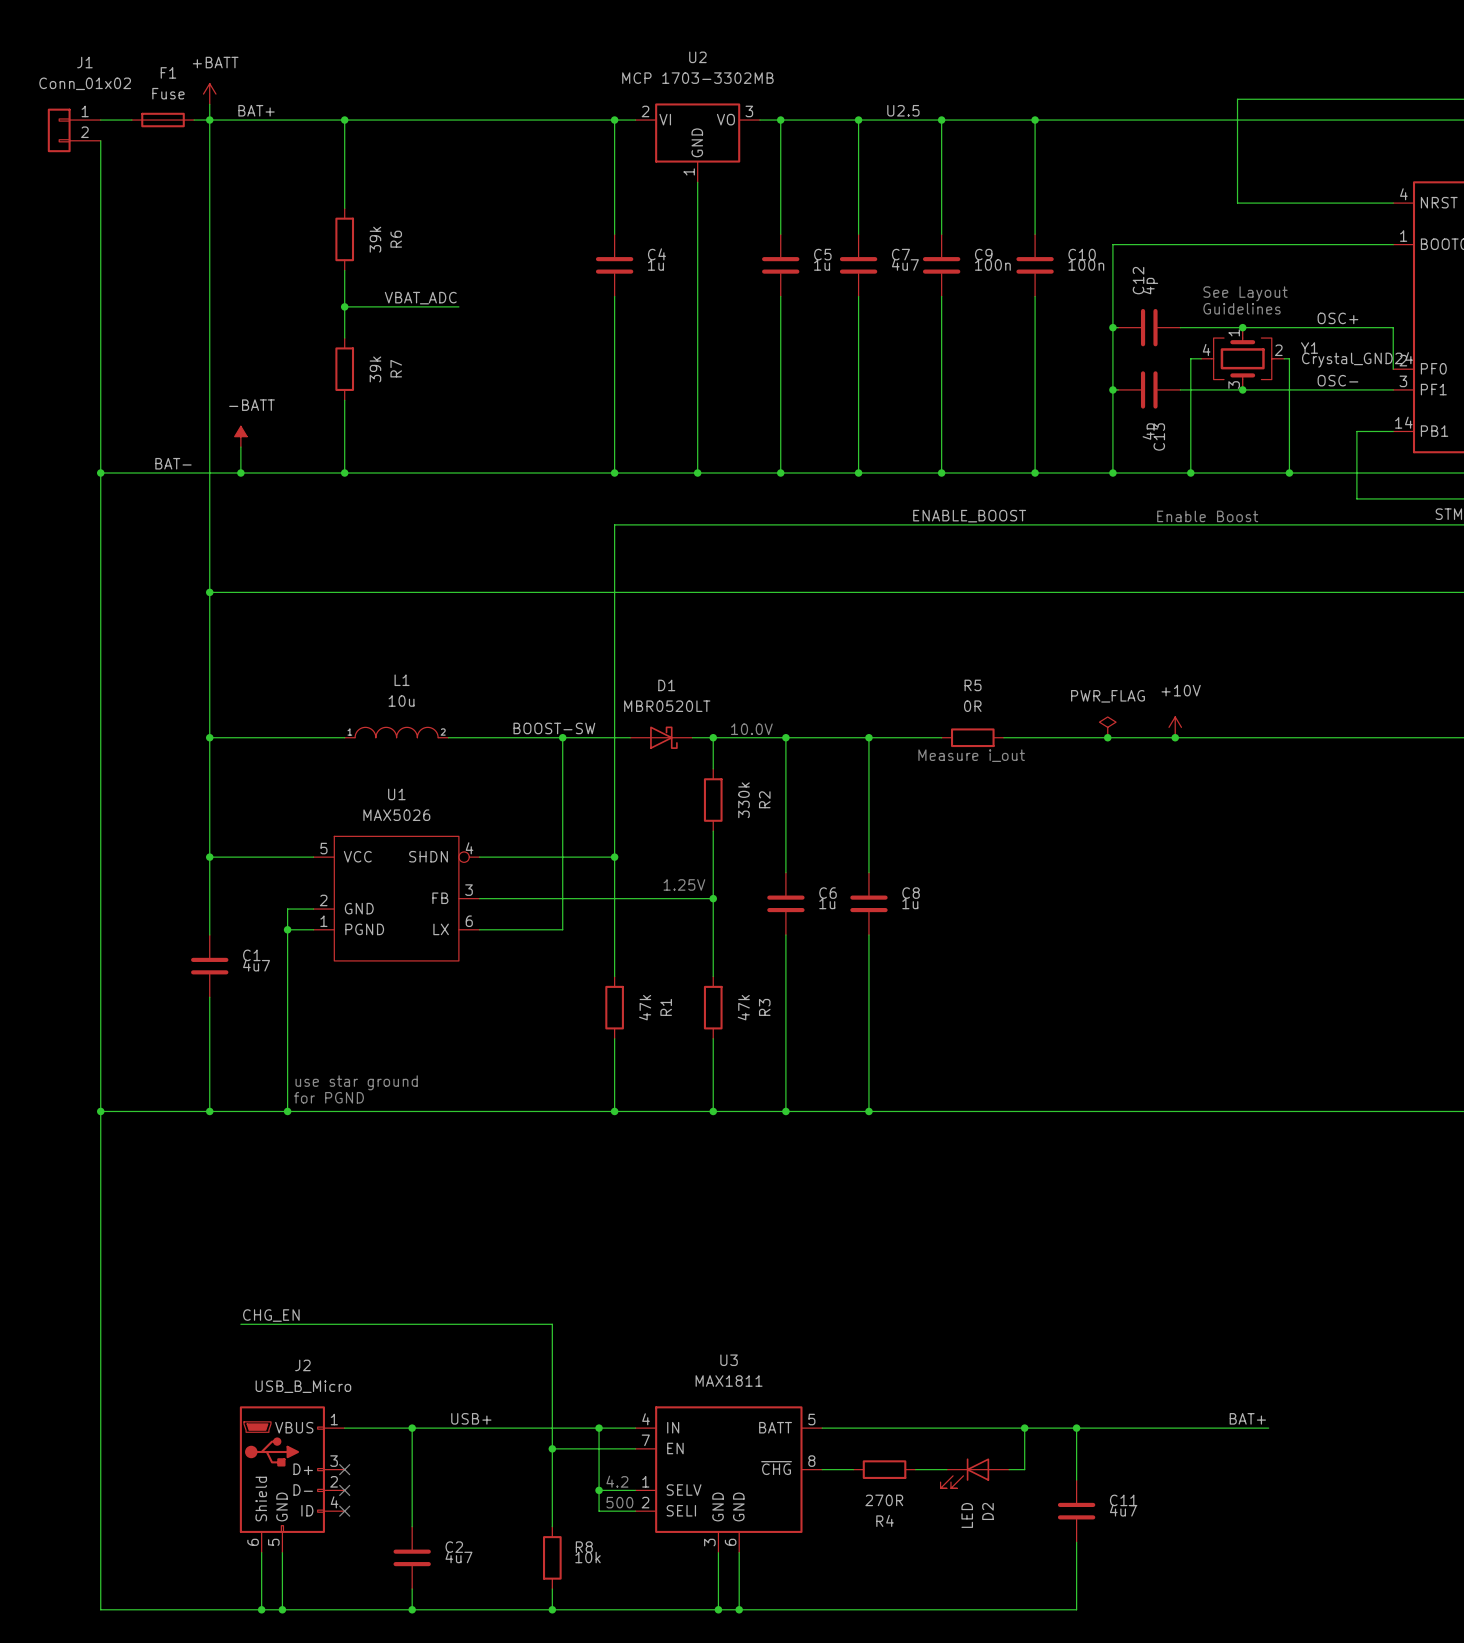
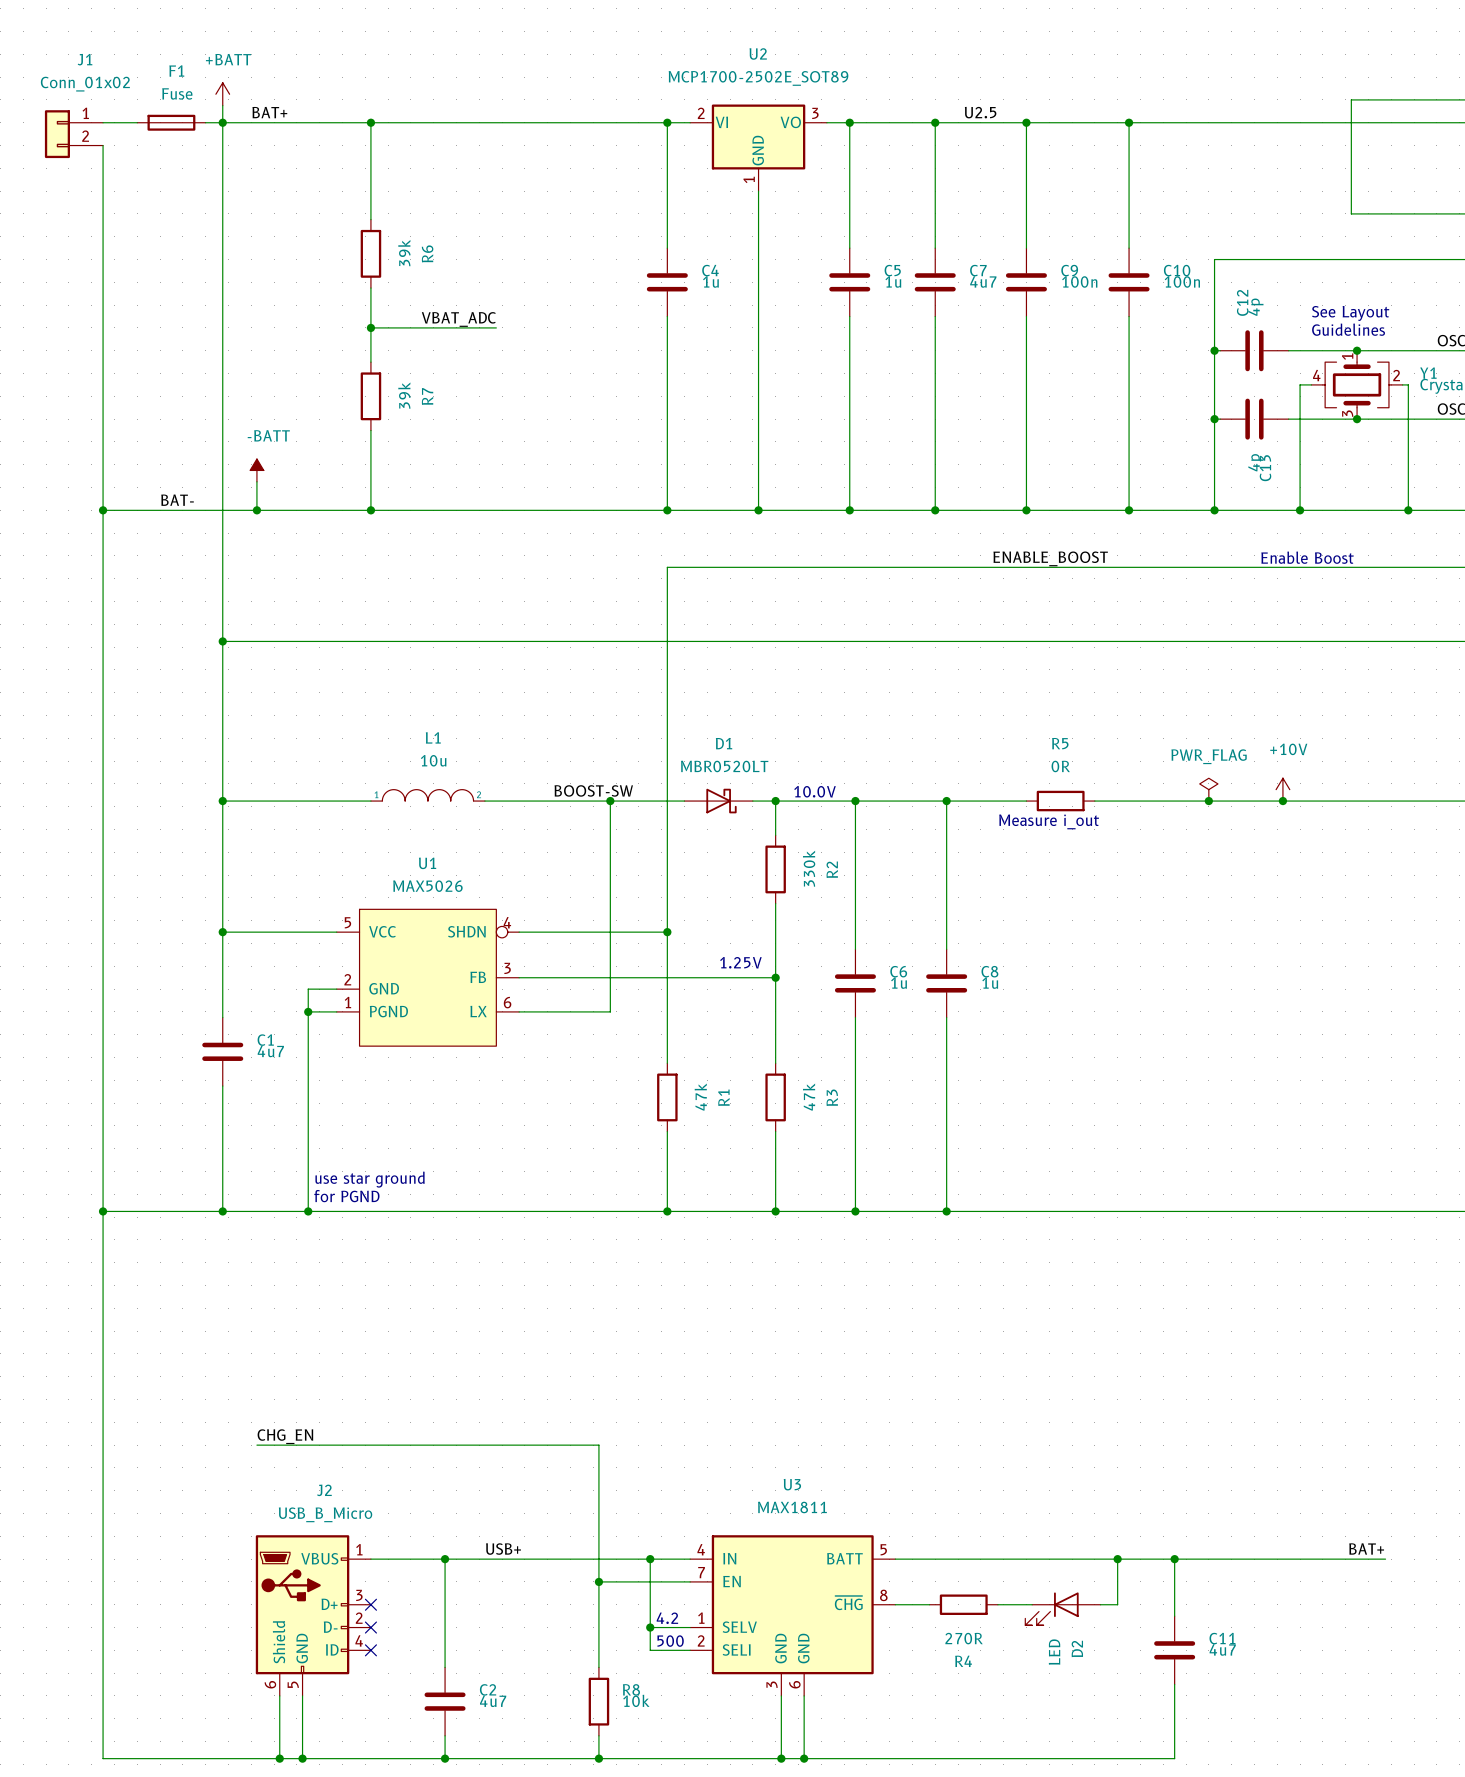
U2 value: MCP 1703-3302MB (697, 78) -> MCP1700-2502E_SOT89 (758, 78)

